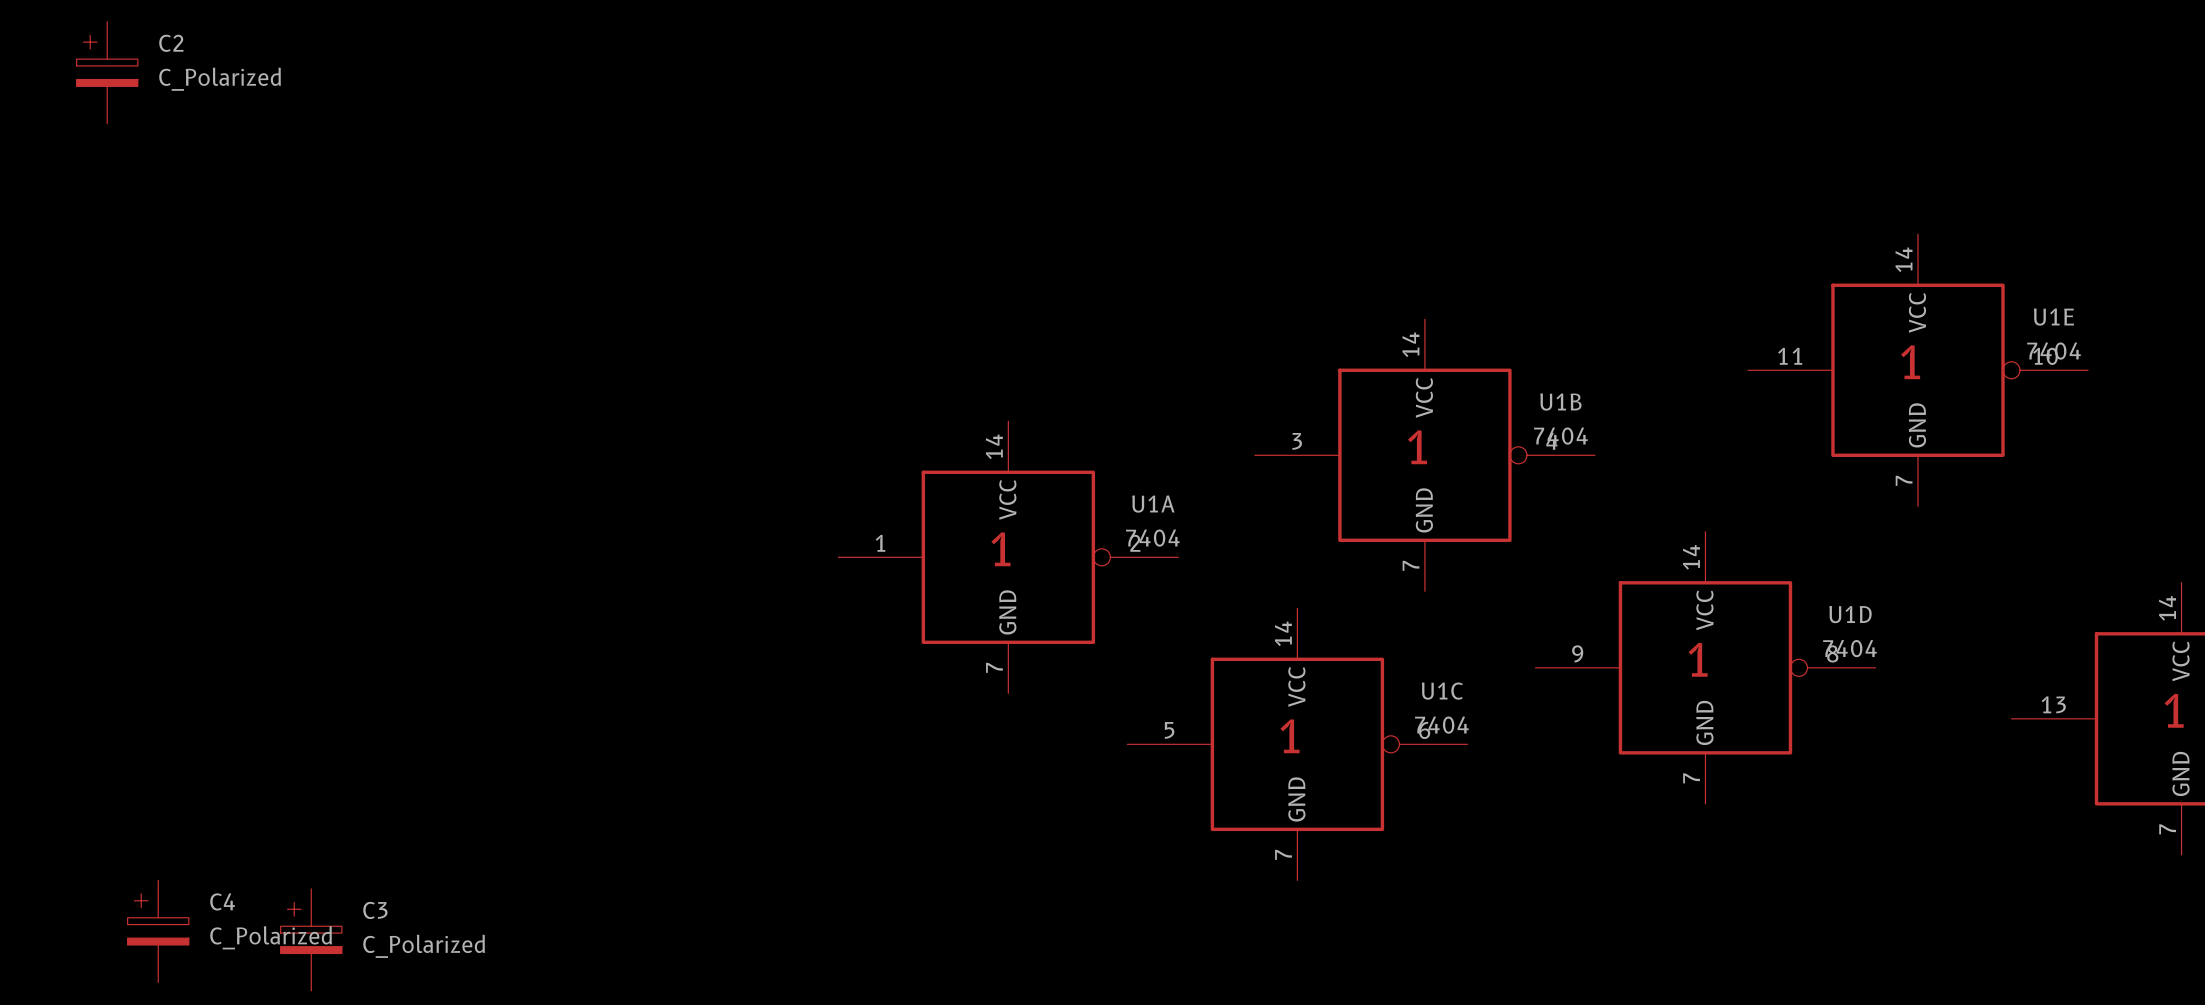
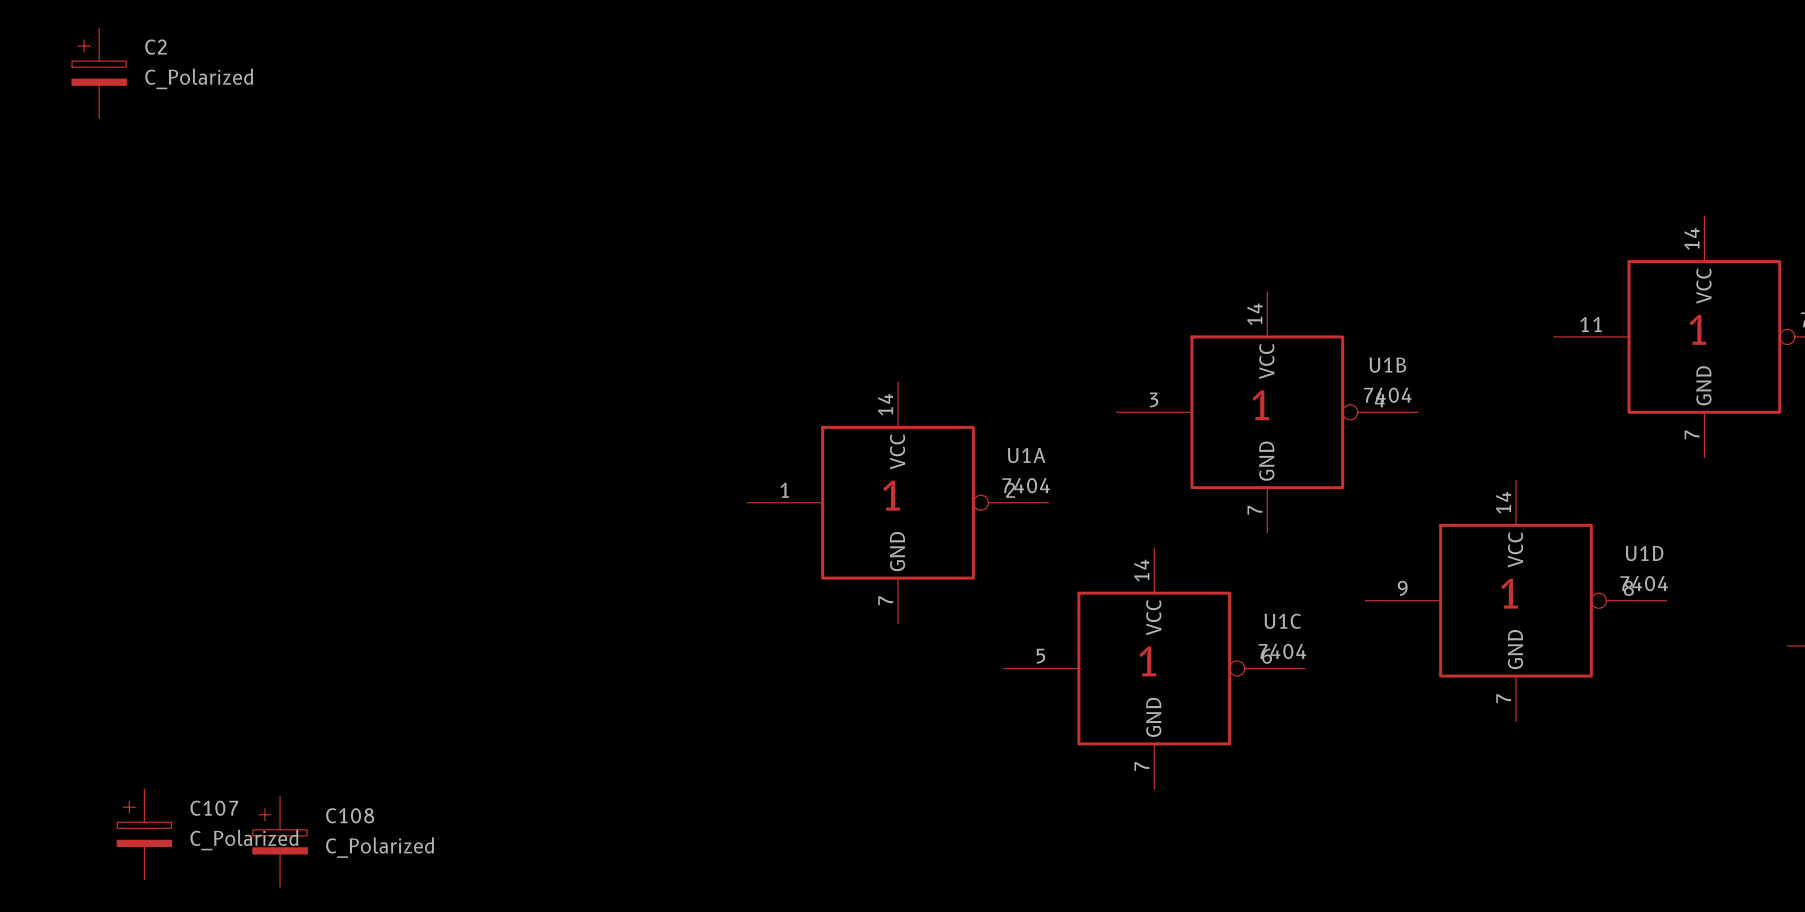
C4 name: C4 (222, 901) -> C107 (214, 808)
C3 name: C3 (375, 910) -> C108 (350, 815)

